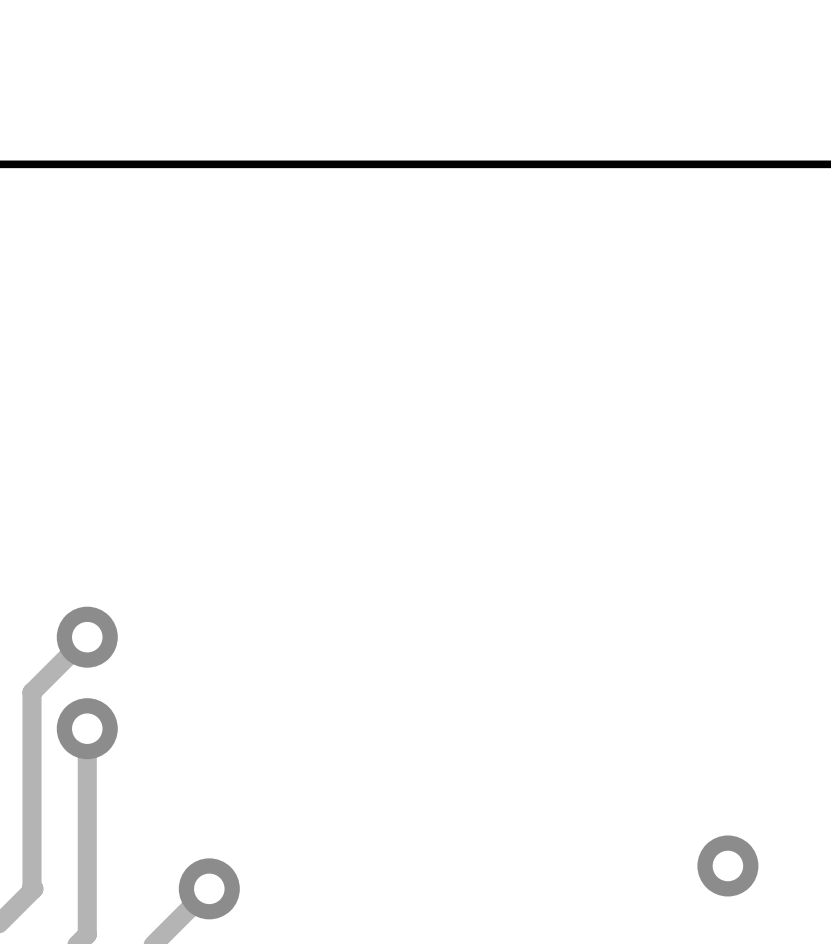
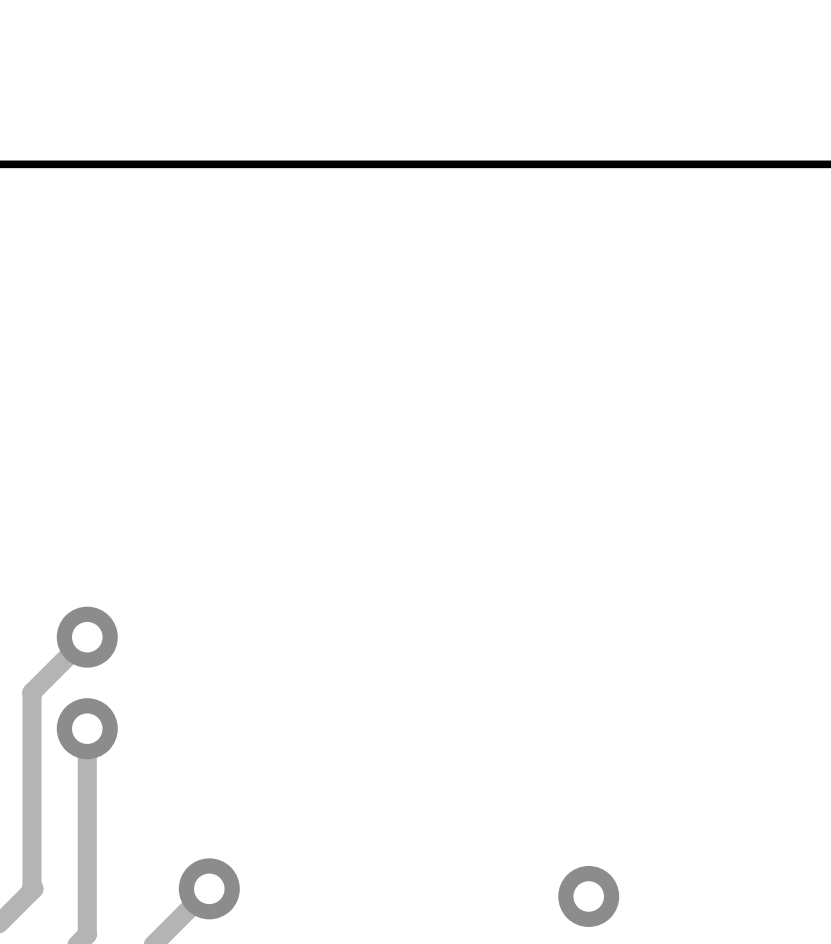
via position: (727, 865) -> (588, 896)

